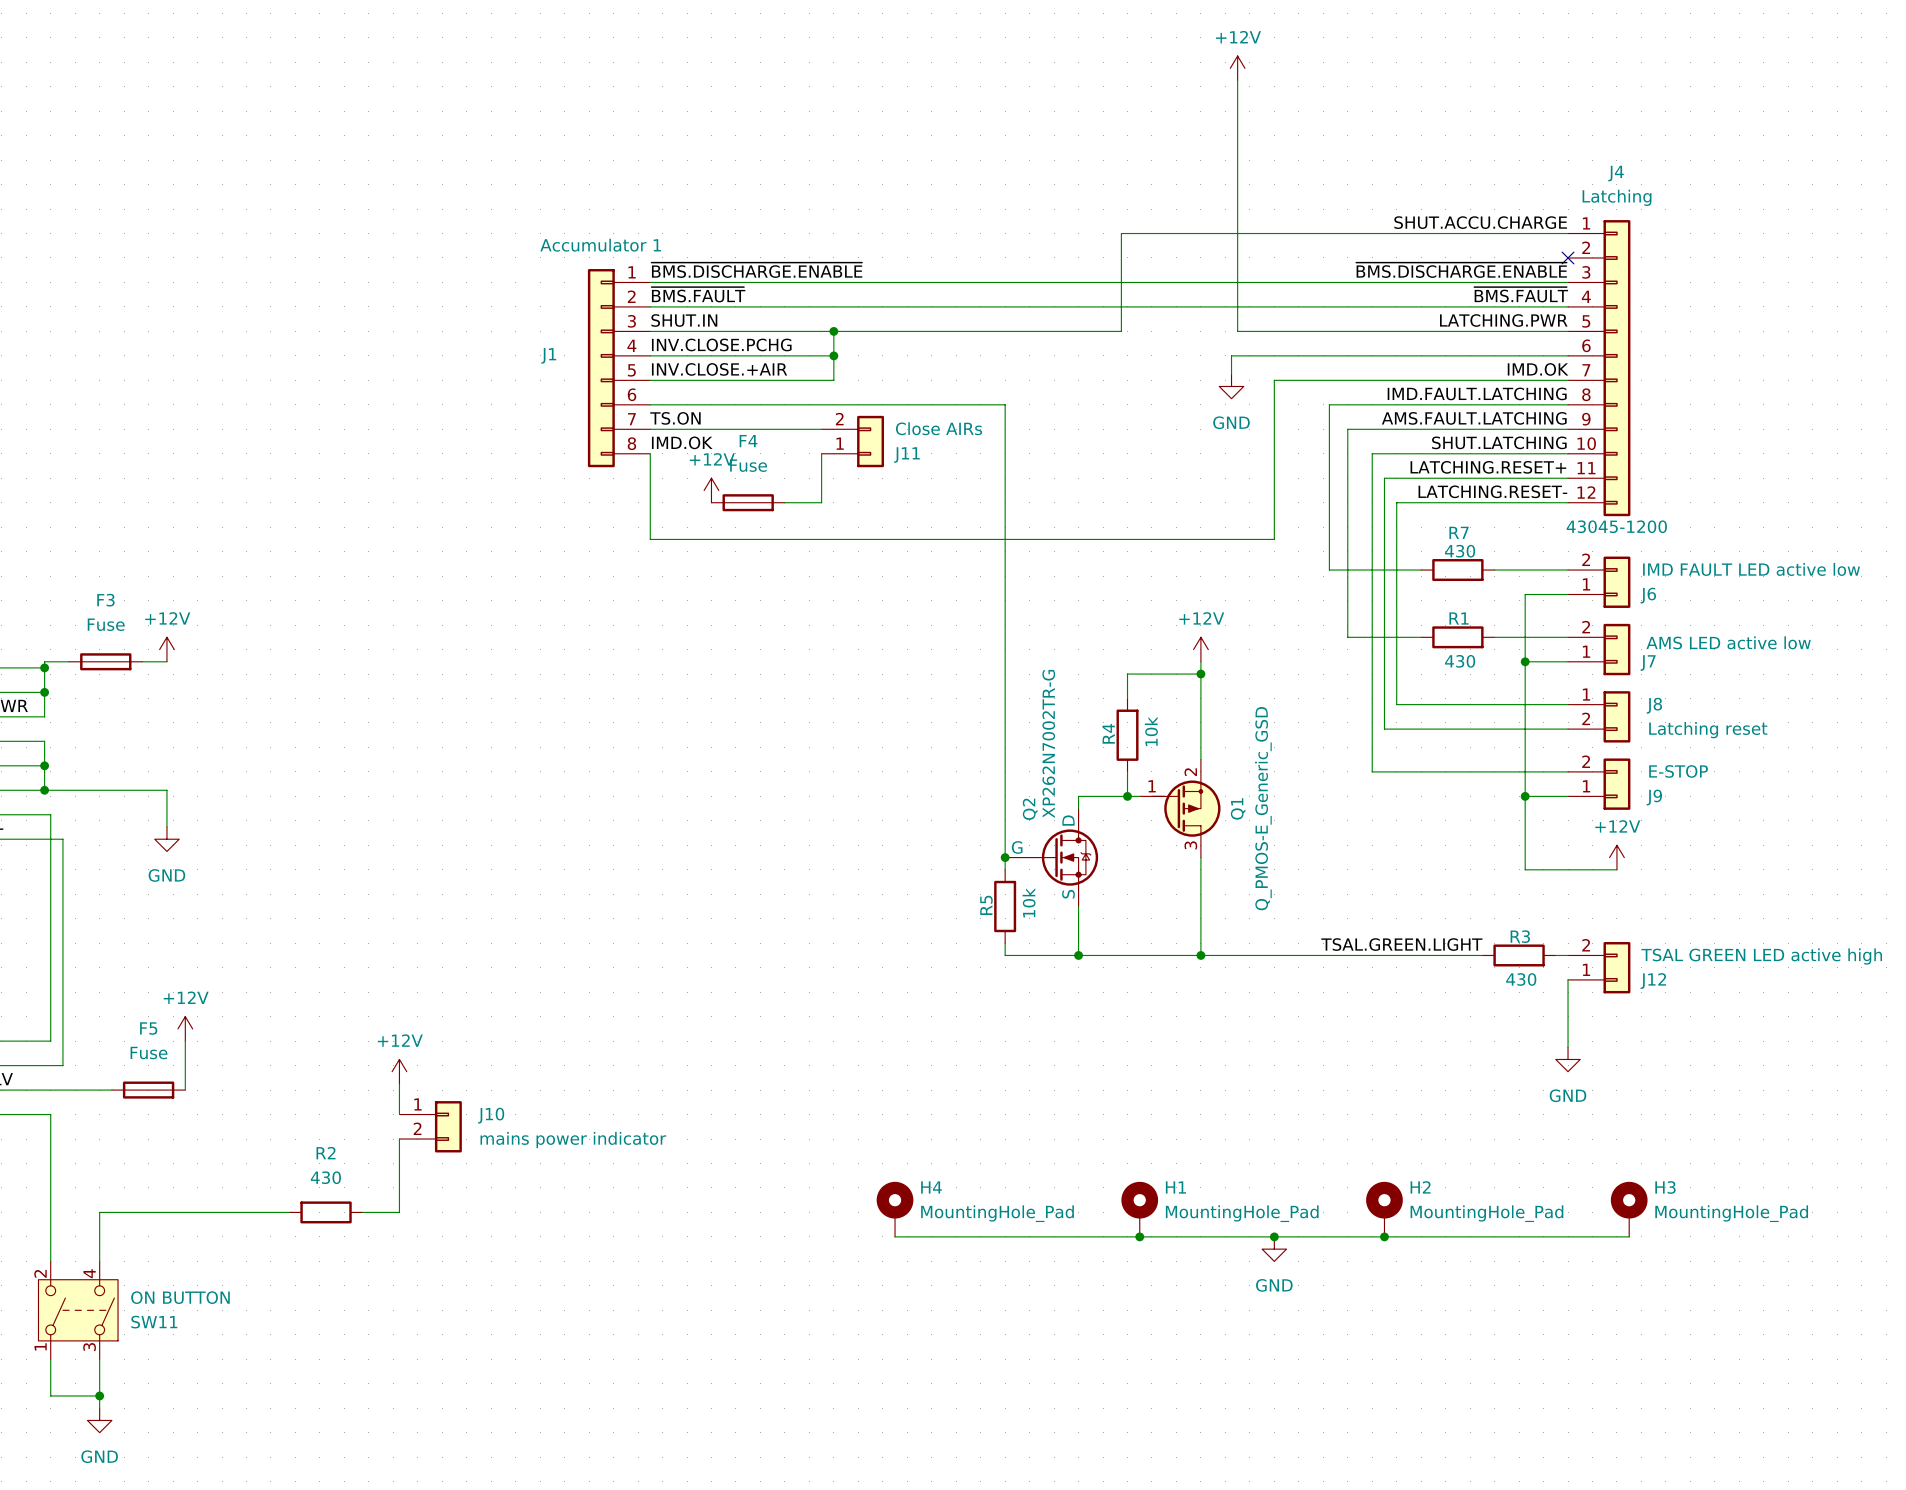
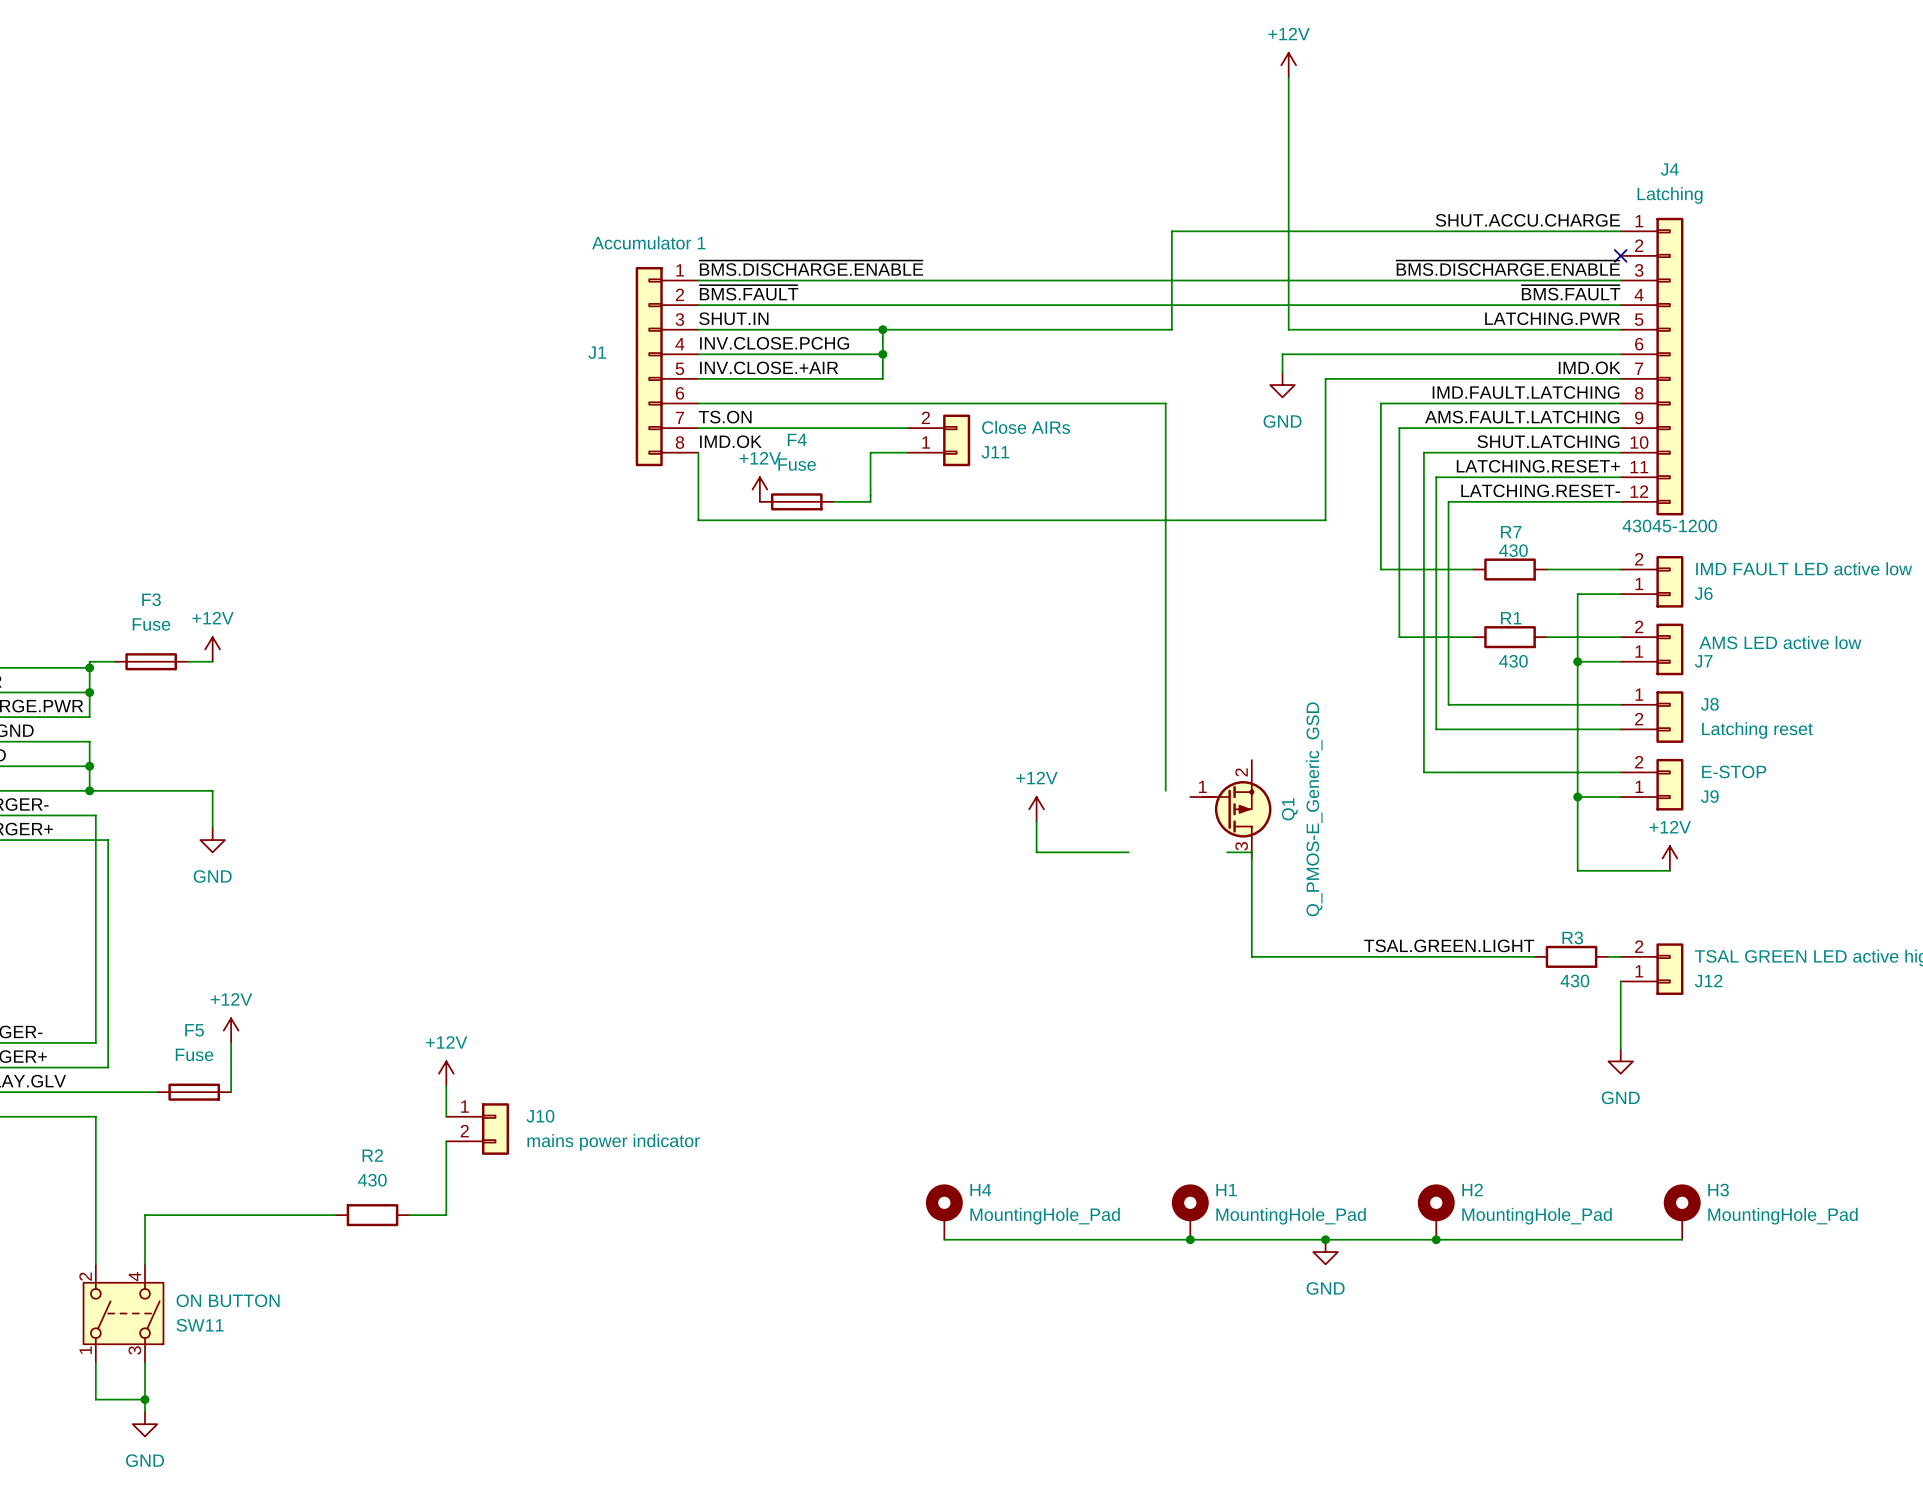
wire: (1005, 404) (1005, 869) -> (1055, 403) (1165, 403) (1165, 790)
J11 position: (852, 441) -> (938, 440)
wire: (650, 521) (650, 539) (1274, 539) (1274, 521) -> (698, 520) (1325, 520)
power symbol: +12V (1200, 649) -> none
wire: (1200, 661) (1200, 759) -> none
wire: (1200, 674) (1127, 674) (1127, 698) -> none
junction: (1200, 674) -> none
R4: 10k (1127, 735) -> none
wire: (1127, 771) (1127, 796) -> none
junction: (1127, 796) -> none
wire: (1139, 796) (1078, 796) (1078, 808) -> none
power symbol: none -> +12V (1036, 809)
wire: none -> (1036, 821) (1036, 852) (1128, 852)
wire: none -> (1227, 852) (1251, 852) (1251, 858)
junction: (1005, 857) -> none
Q2: XP262N7002TR-G (1051, 857) -> none
R5: 10k (1005, 906) -> none
wire: (1078, 906) (1078, 955) -> none
wire: (1005, 943) (1005, 955) (1200, 955) -> none
junction: (1078, 955) -> none
junction: (1200, 955) -> none

